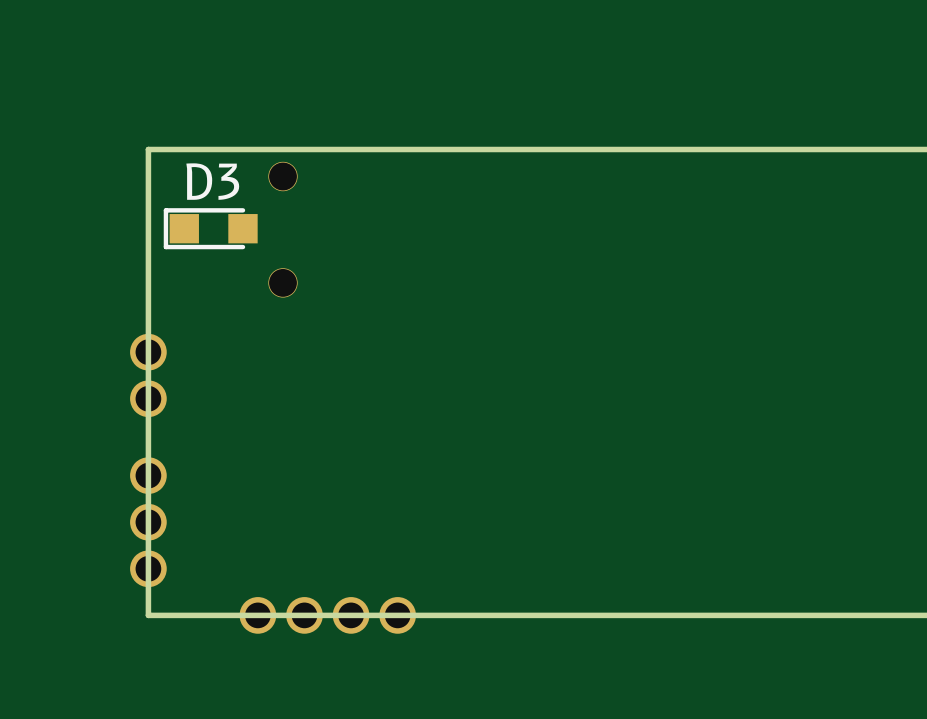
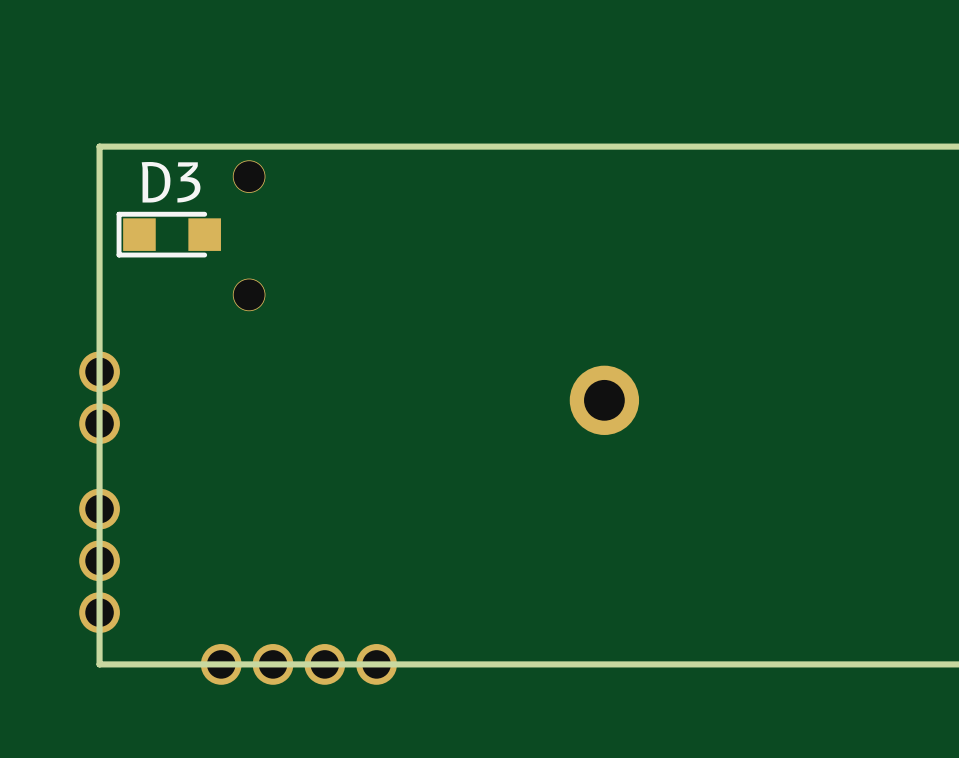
part: none -> (604, 400)

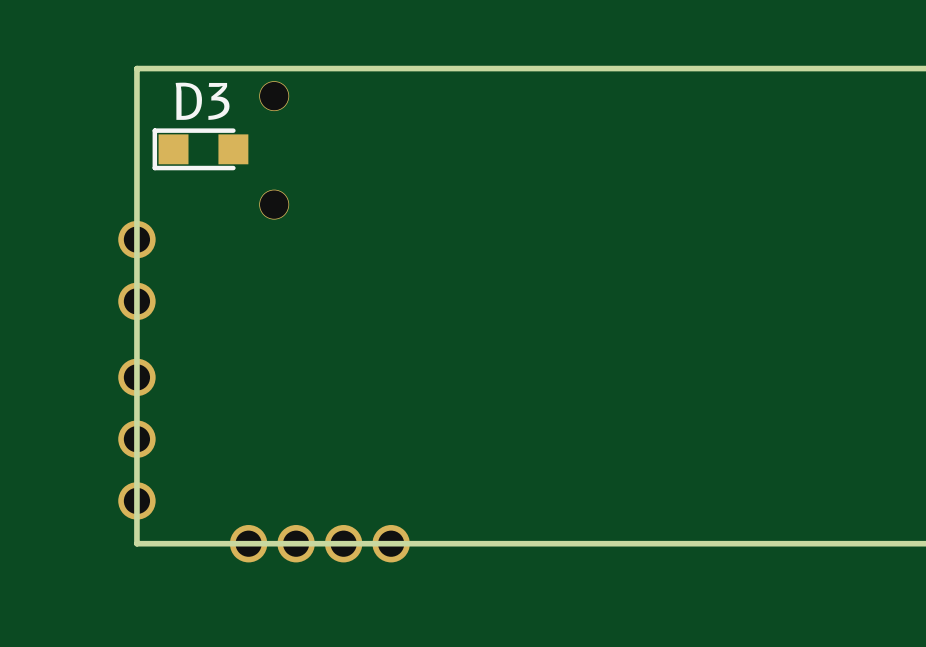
part: none -> (136, 239)
part footprint: [79, 351, 120, 445] -> [118, 282, 156, 321]
part: (604, 400) -> none
part: none -> (136, 377)
part footprint: [79, 488, 120, 634] -> [118, 420, 156, 458]
part: none -> (136, 500)

